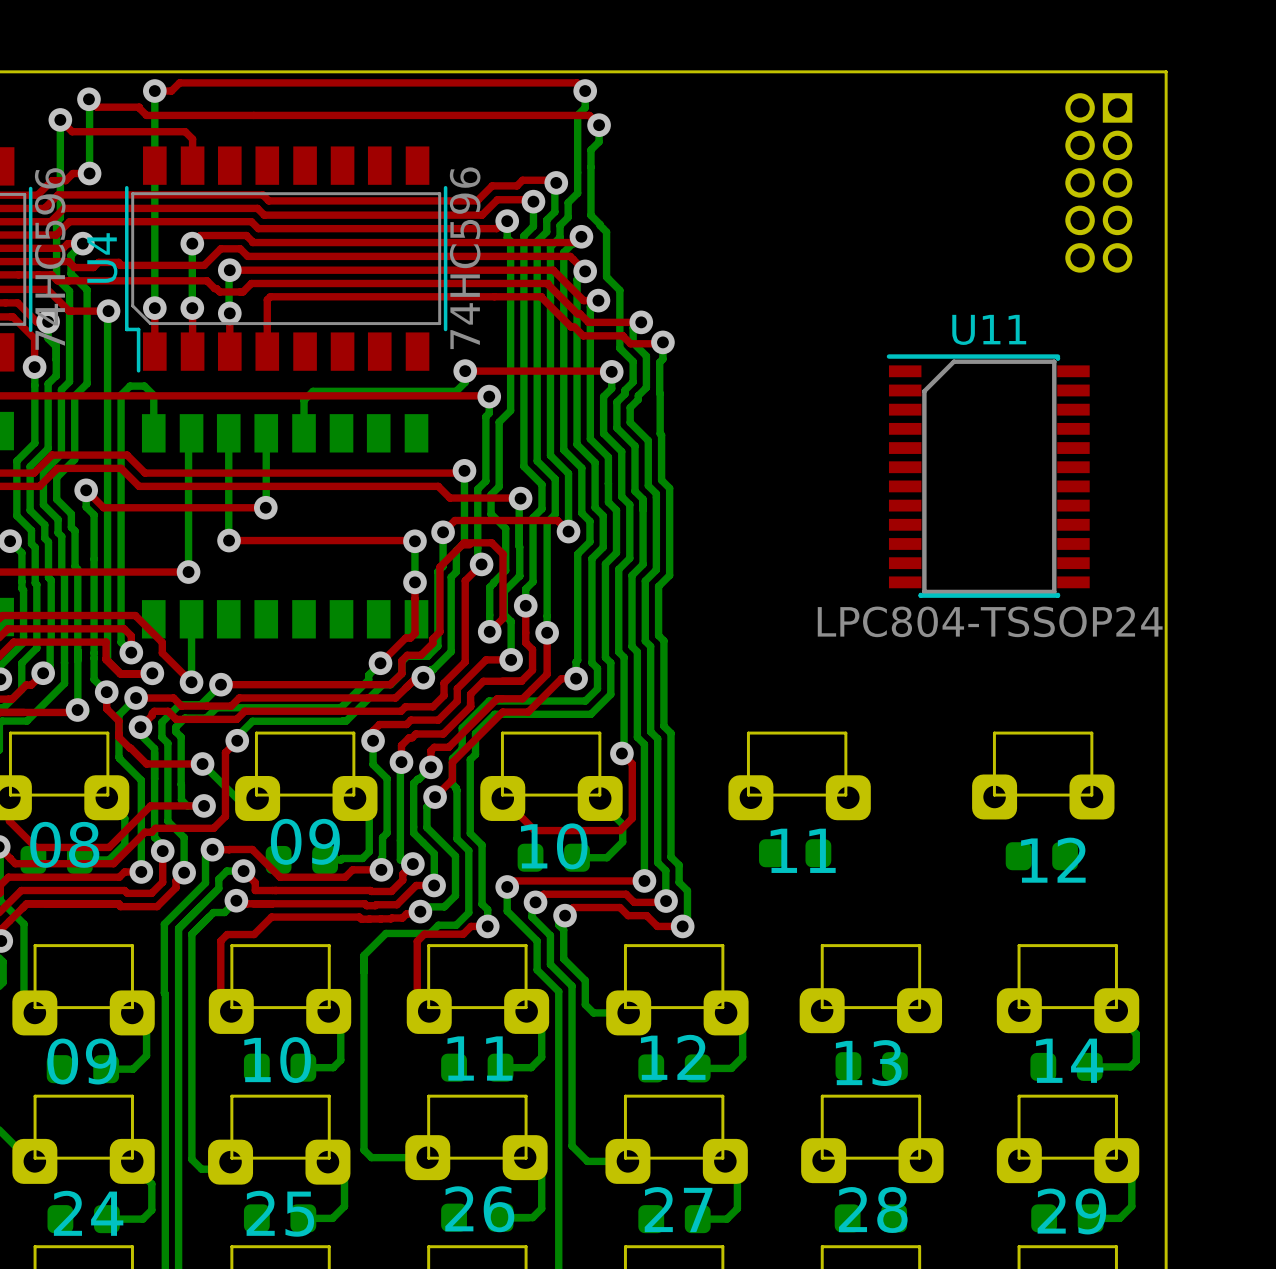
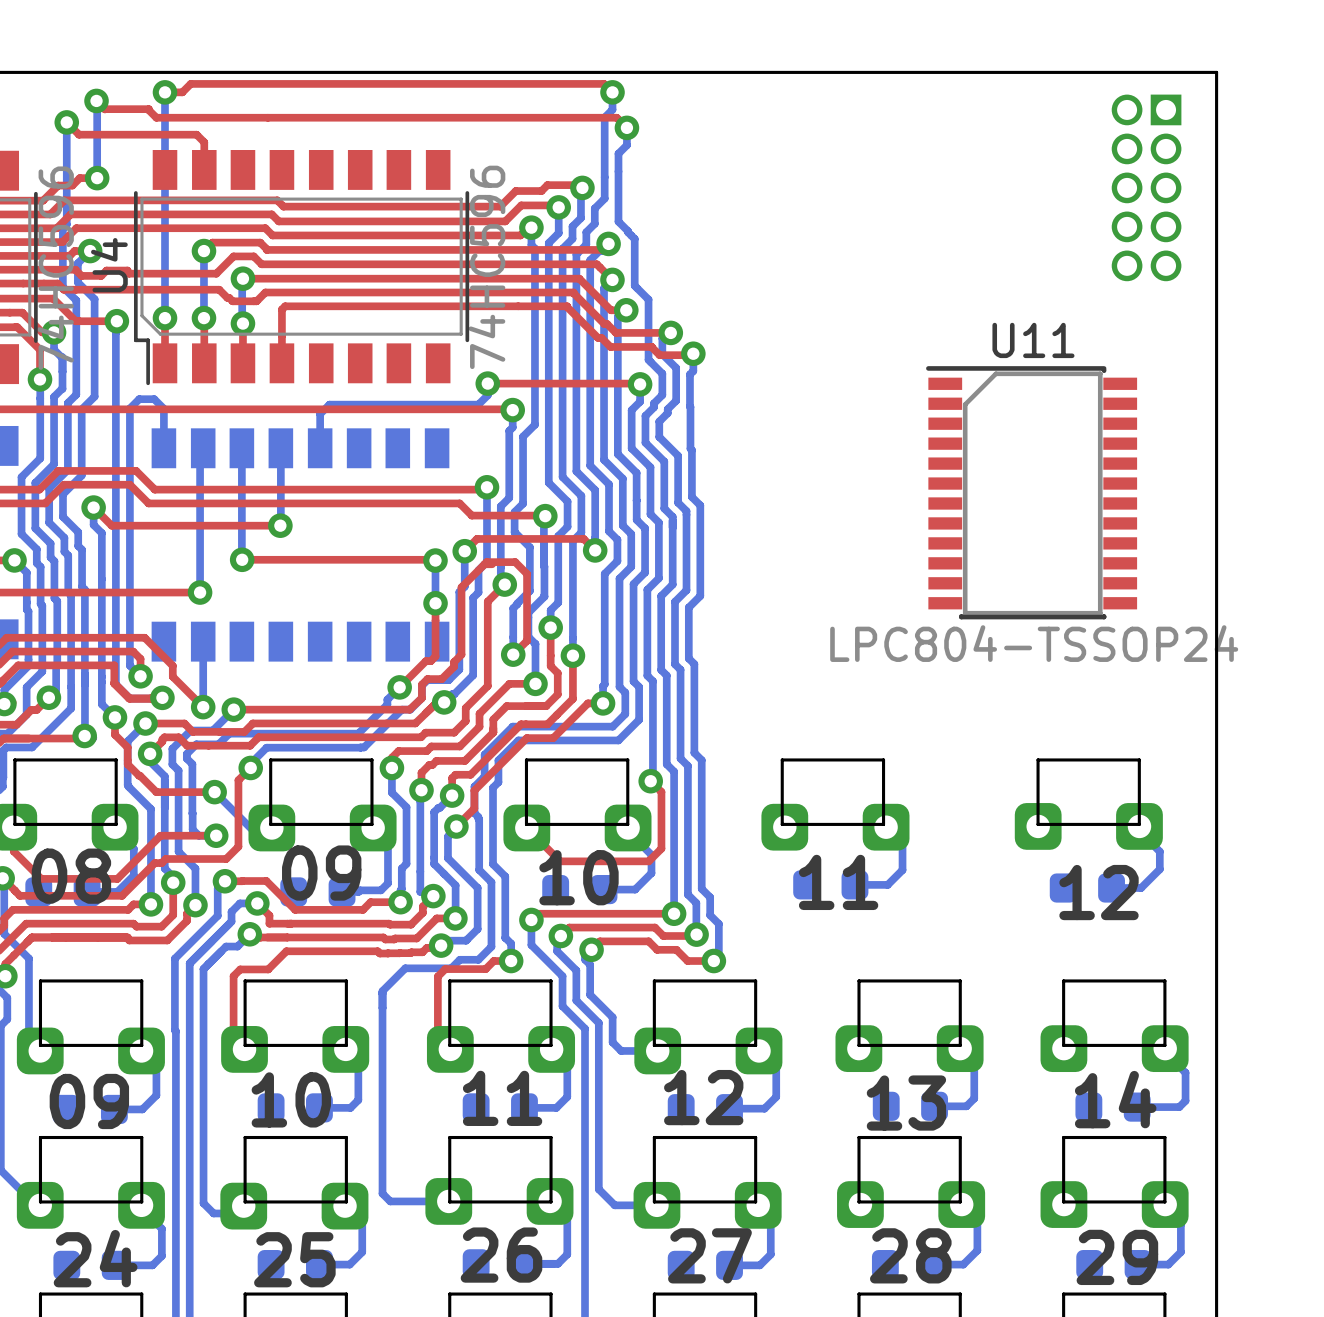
bottom track: none -> (891, 832) (902, 843) (902, 870) (887, 884) (854, 884)
bottom track: none -> (1139, 835) (1144, 835) (1159, 851) (1159, 869) (1141, 888) (1111, 888)
bottom track: none -> (960, 1056) (965, 1056) (974, 1066) (974, 1098) (966, 1106) (934, 1106)
bottom track: none -> (967, 1210) (977, 1220) (977, 1250) (963, 1264) (933, 1264)

